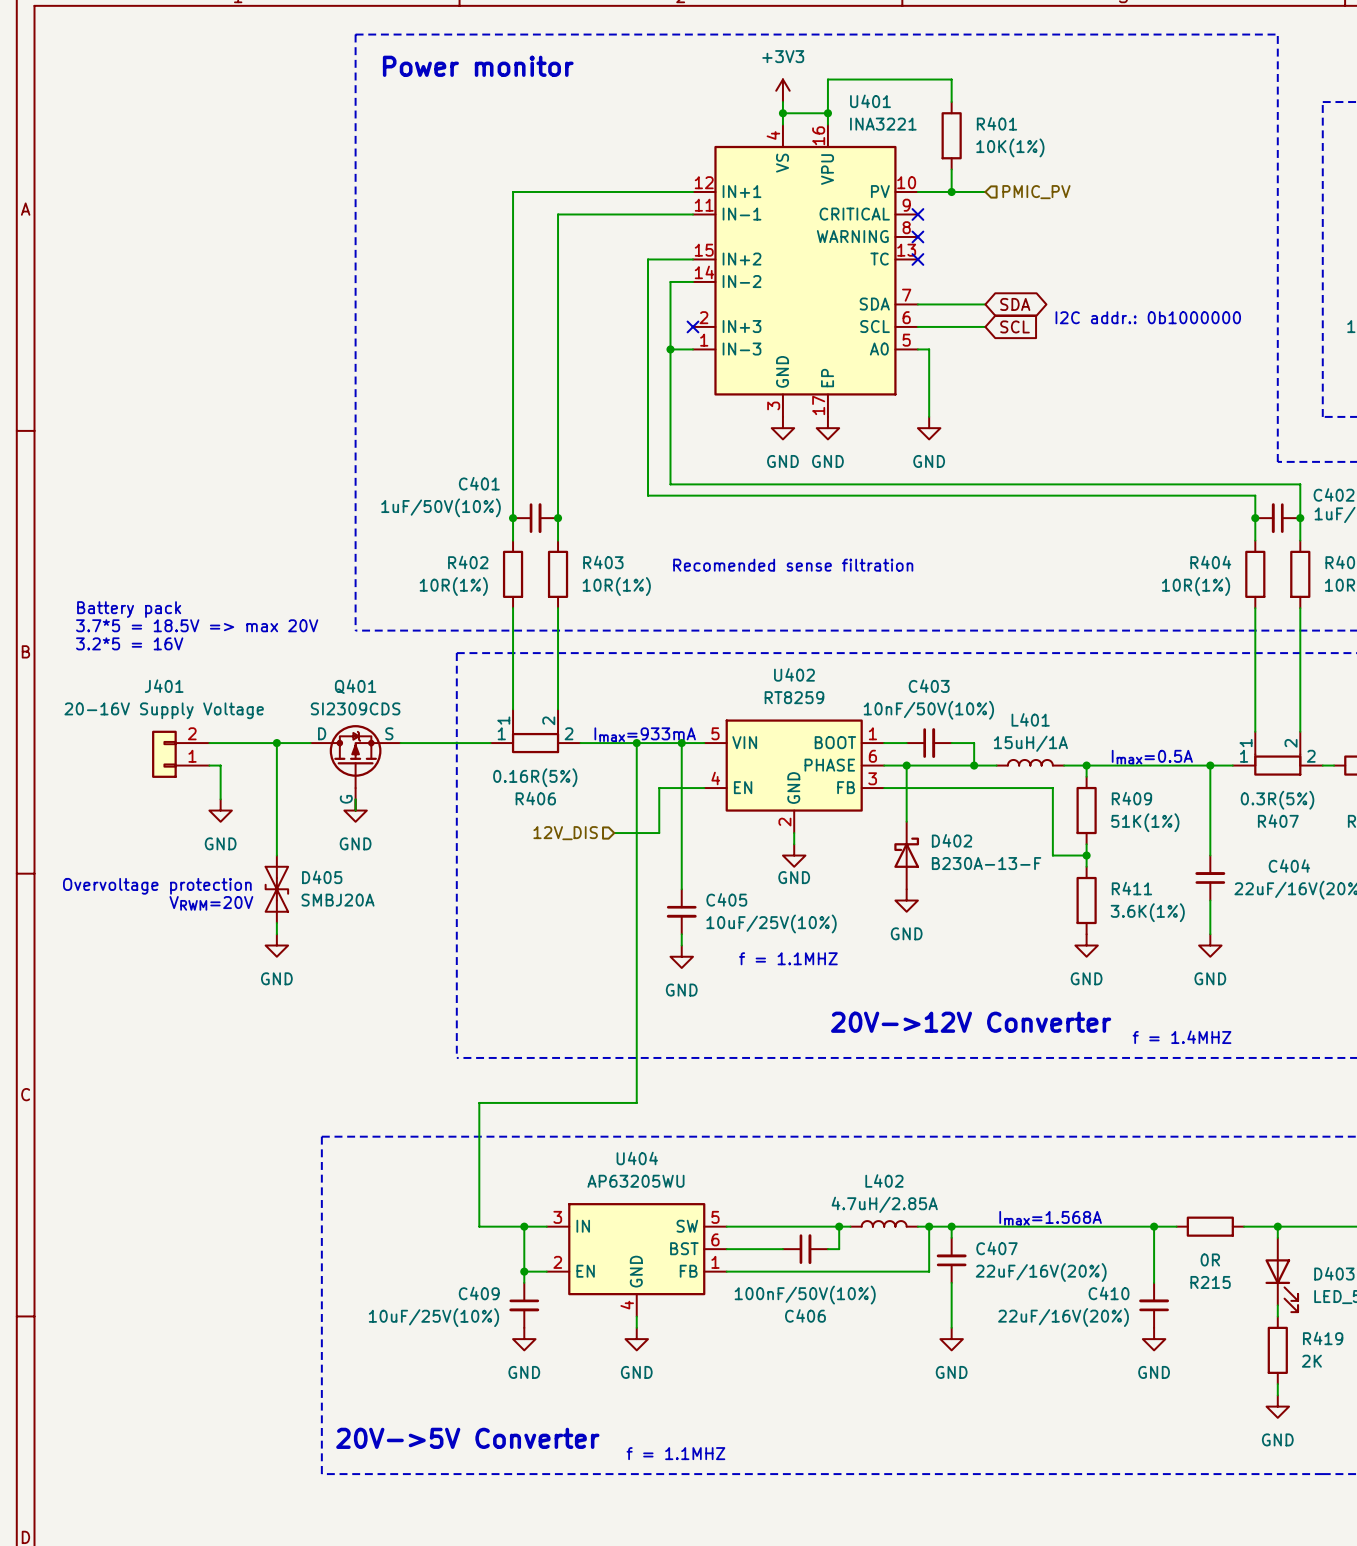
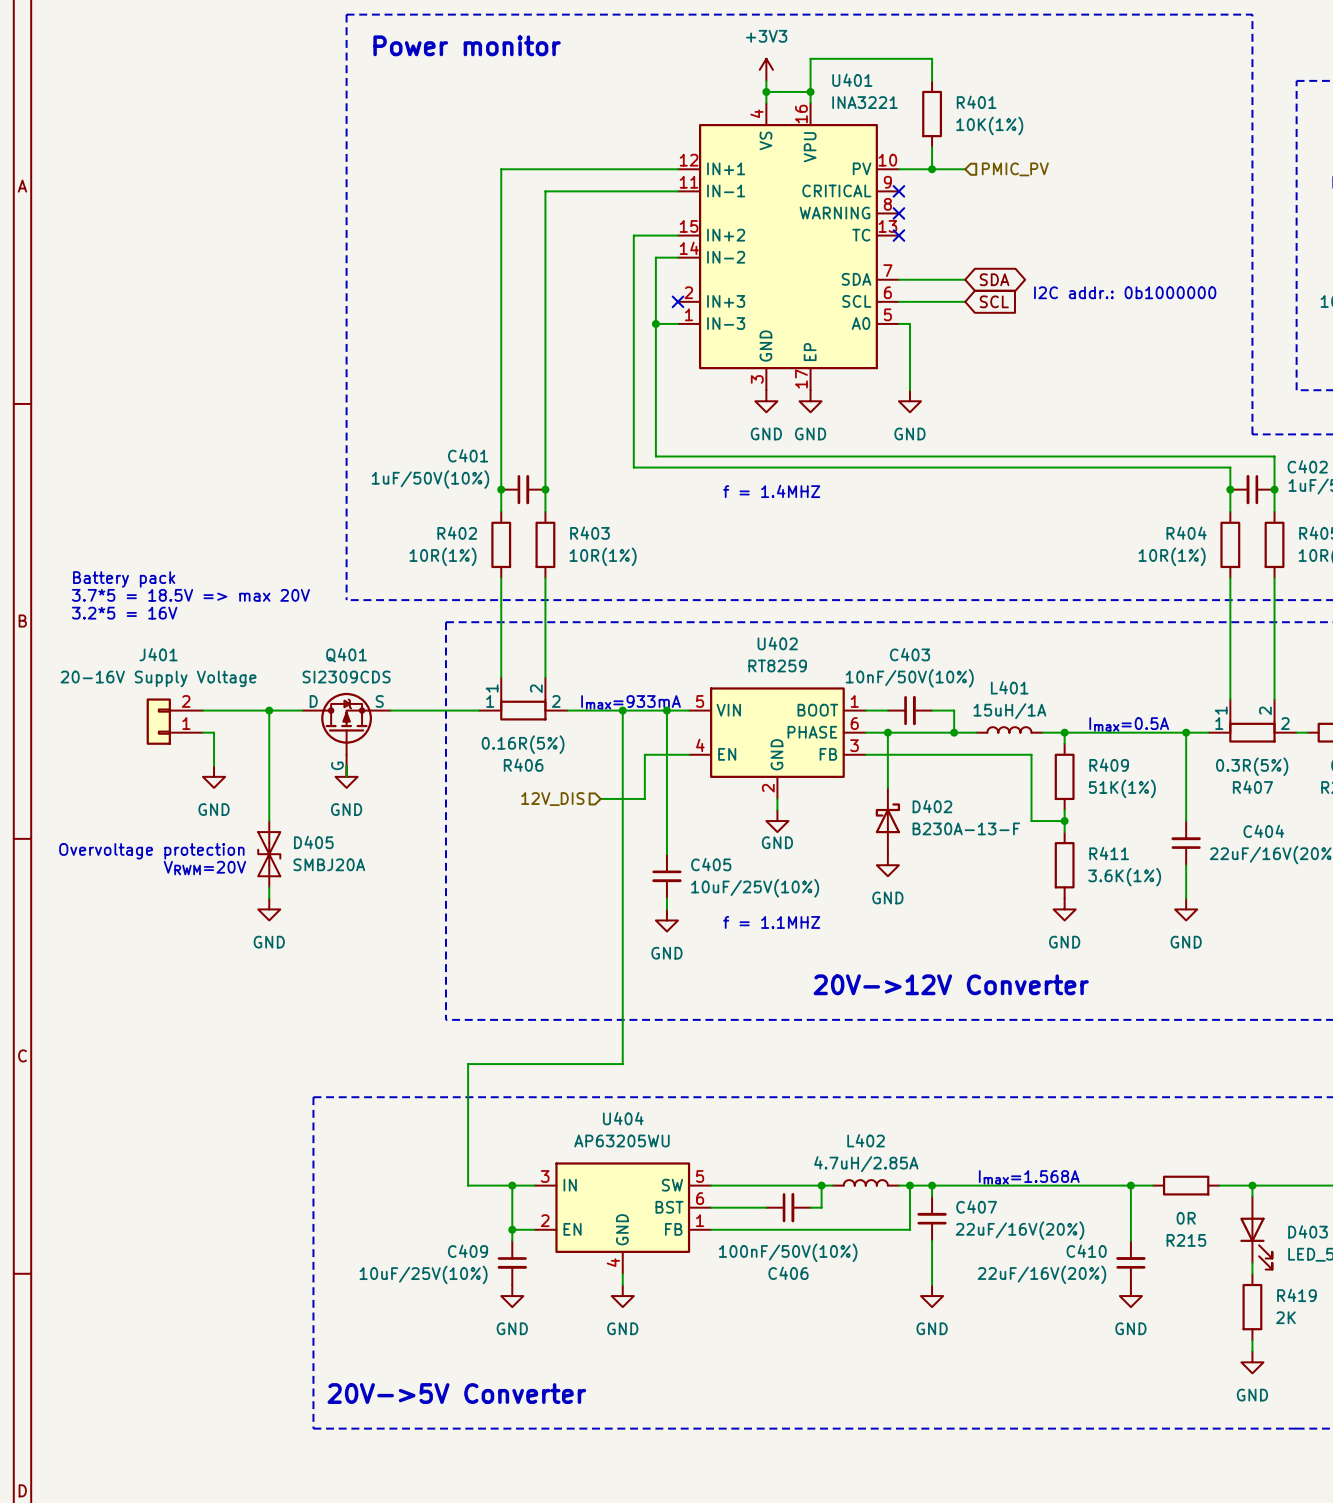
text: none -> f = 1.4MHZ (771, 491)
text: Recomended sense filtration (793, 565) -> none
text: f = 1.4MHZ (1182, 1037) -> none
text: f = 1.1MHZ (675, 1453) -> none

